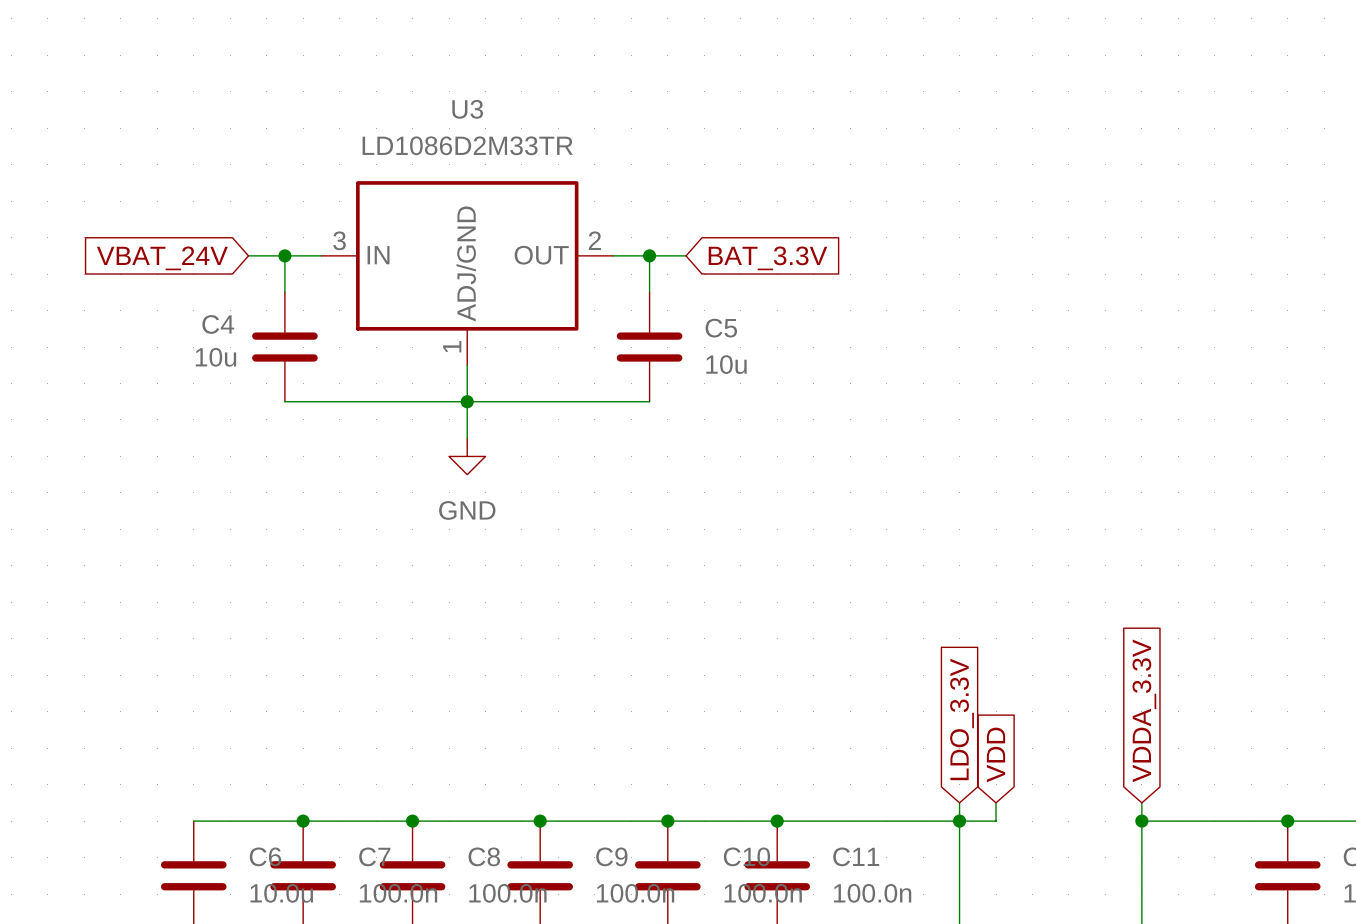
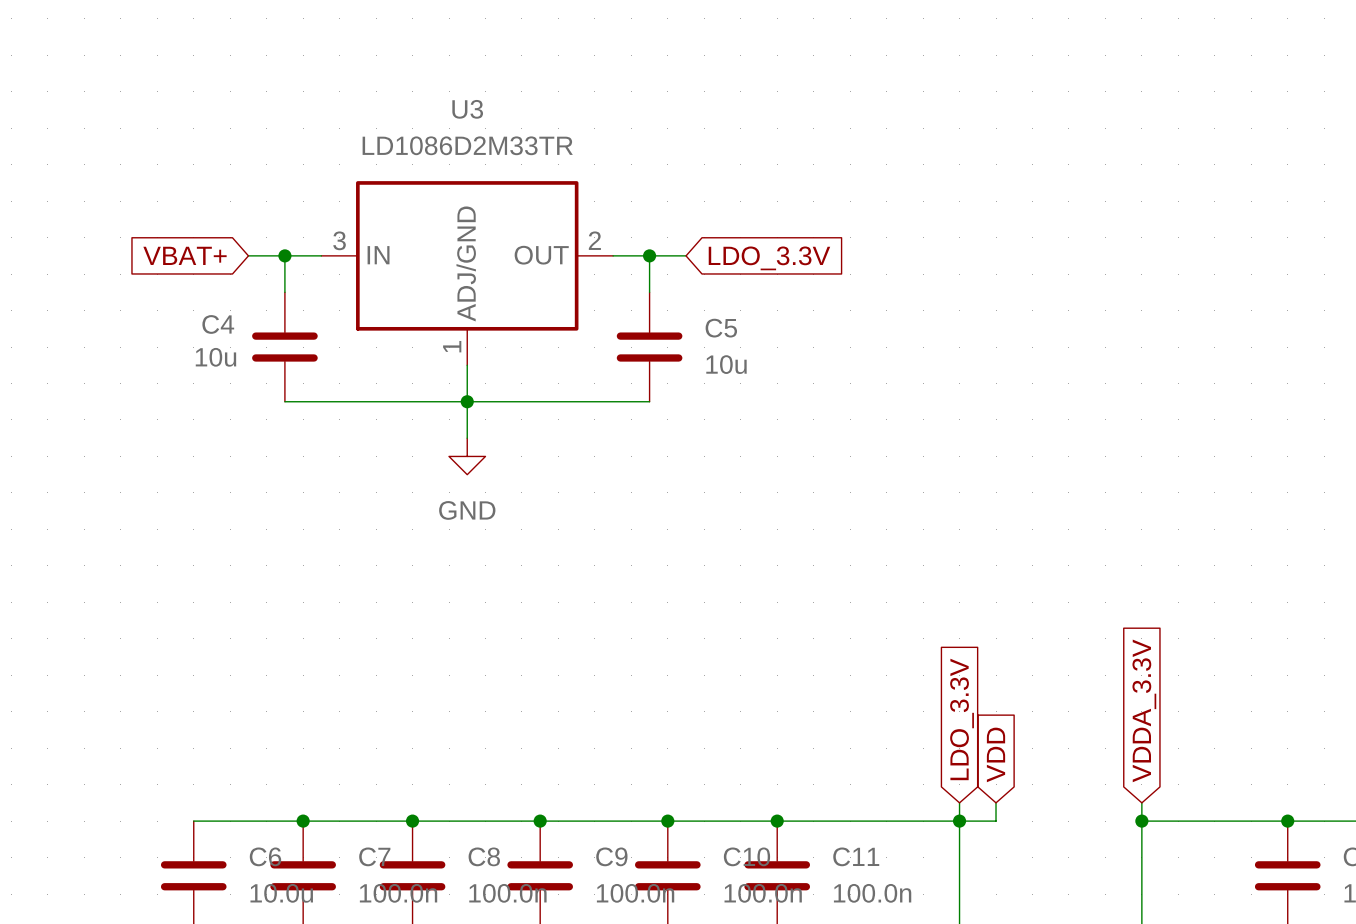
global label: VBAT_24V (162, 258) -> VBAT+ (185, 255)
global label: BAT_3.3V (767, 258) -> LDO_3.3V (769, 258)

